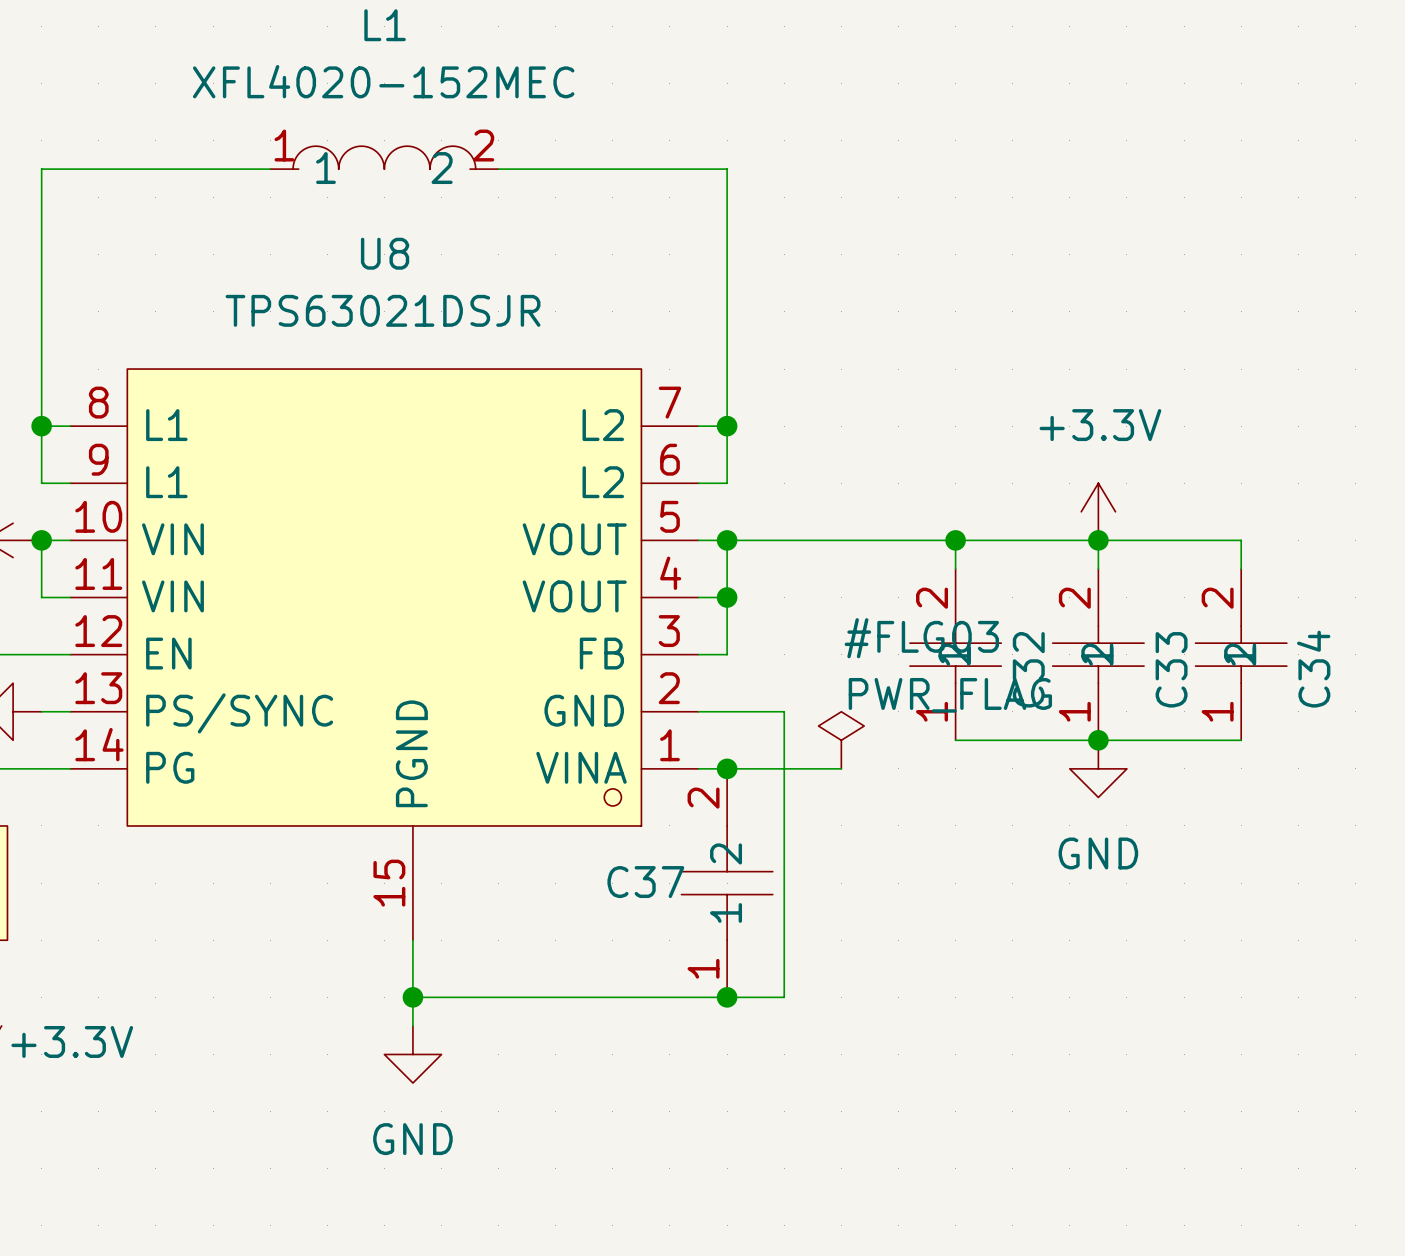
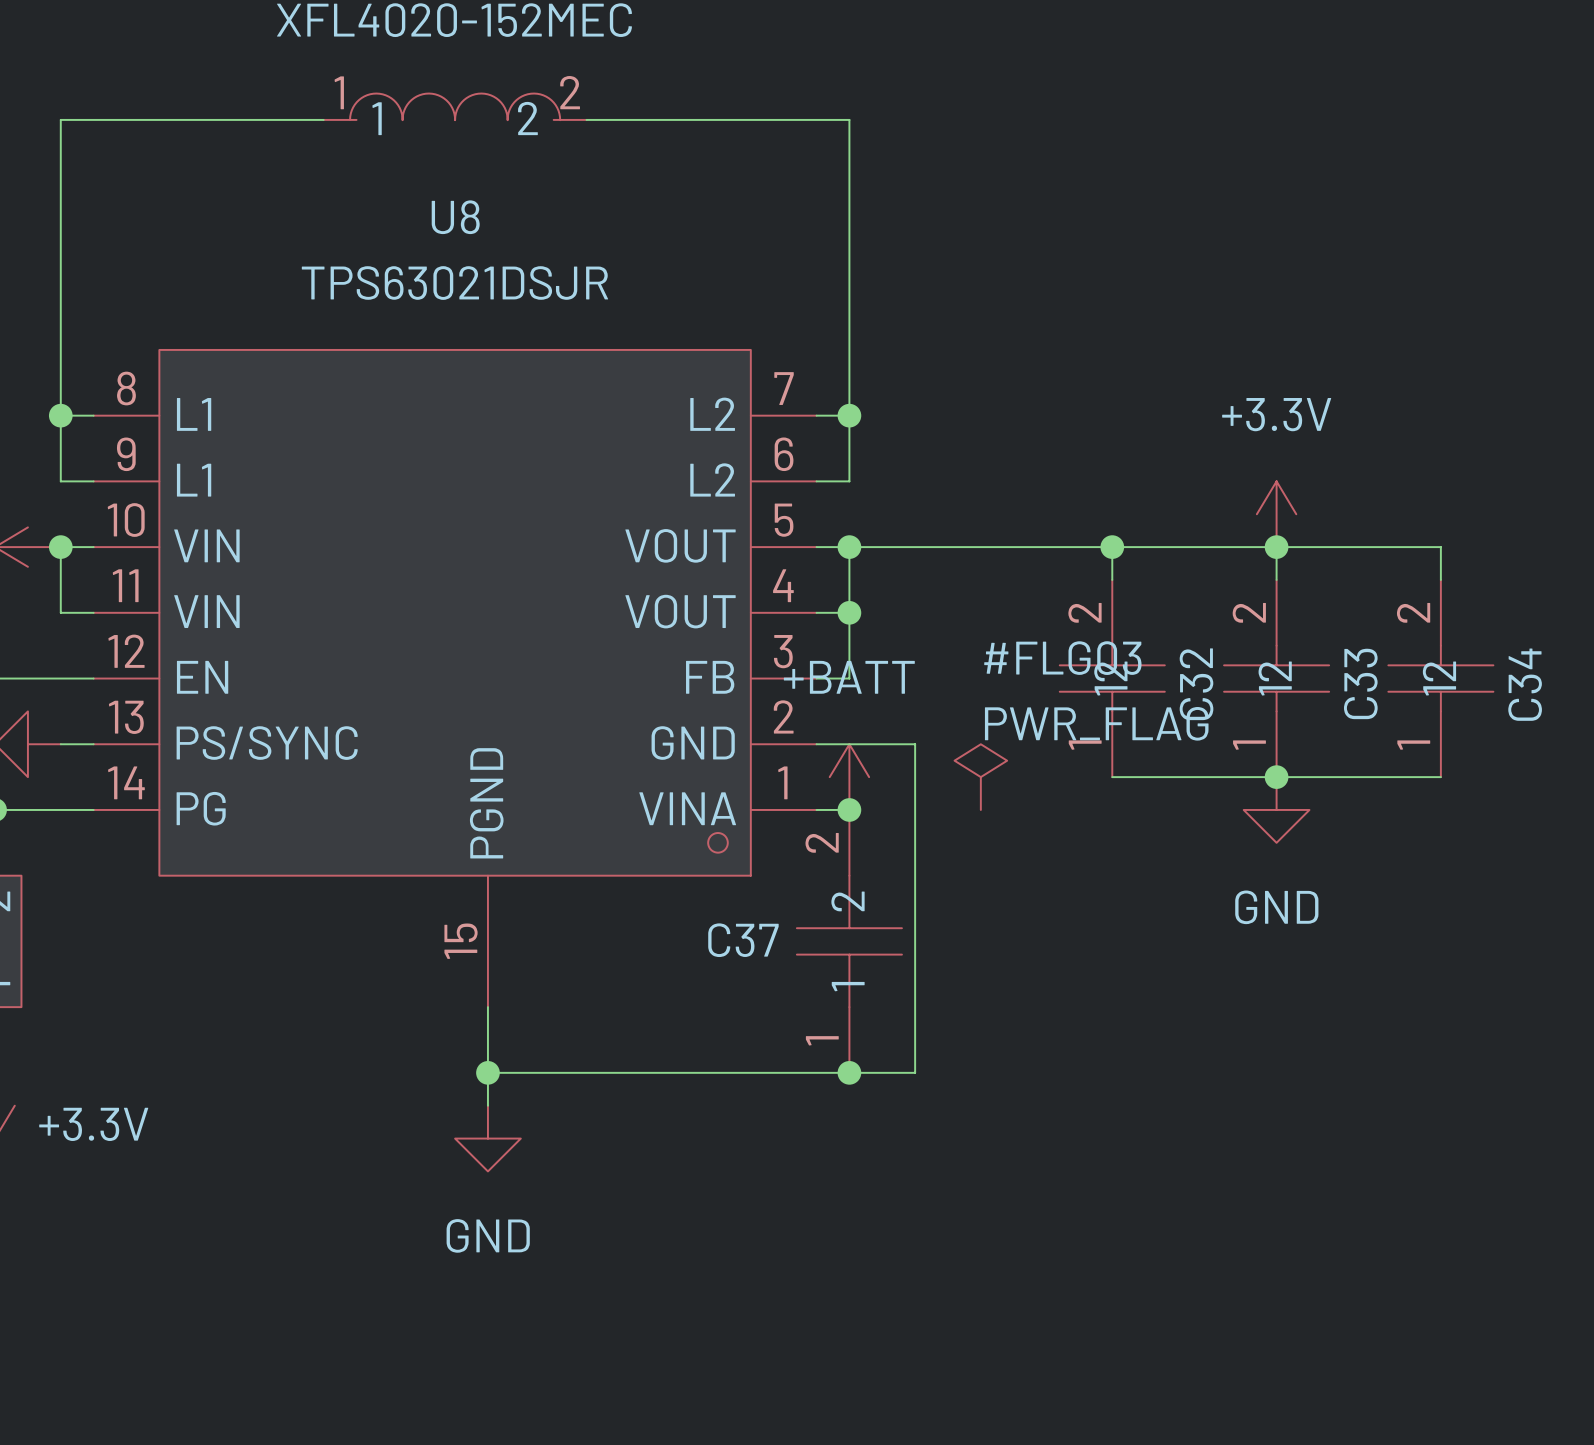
power symbol: none -> +BATT (849, 777)
wire: (727, 768) (841, 768) -> none

